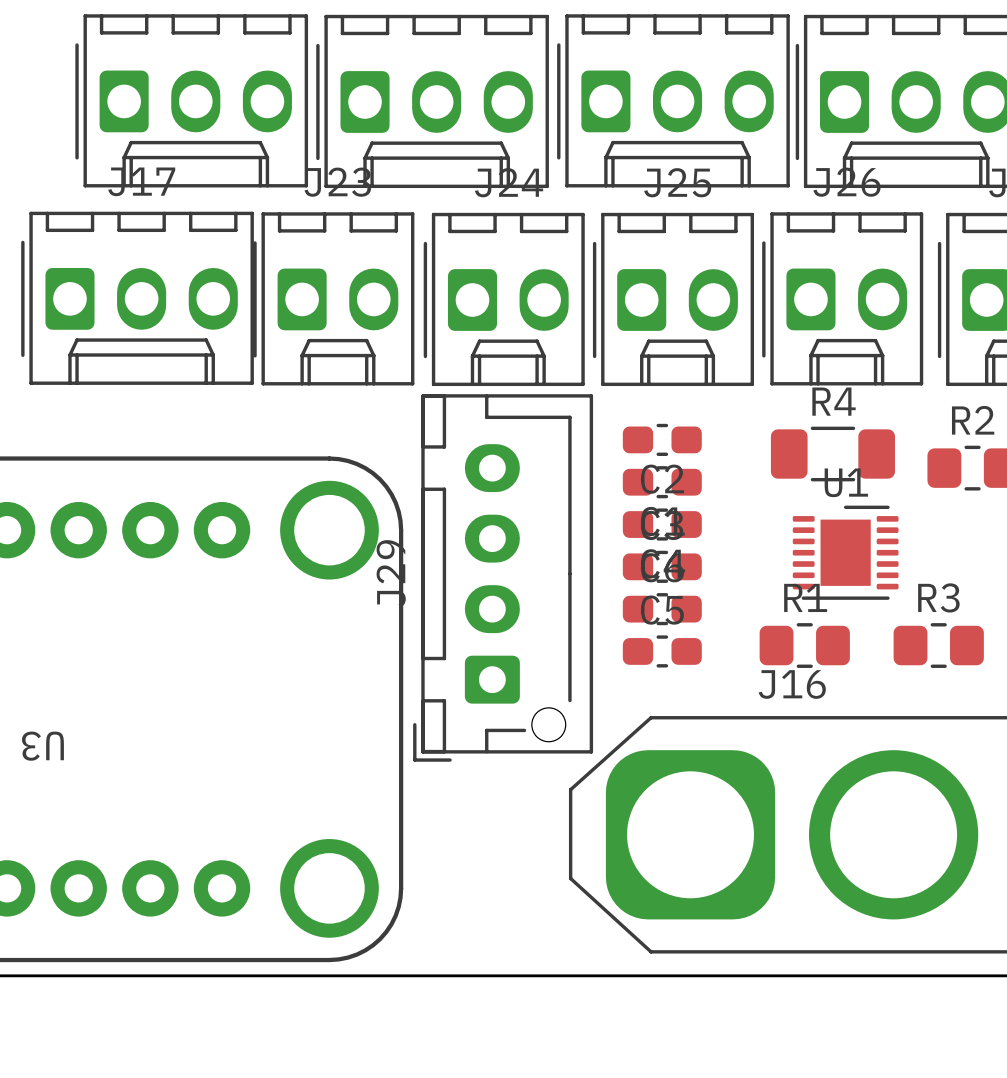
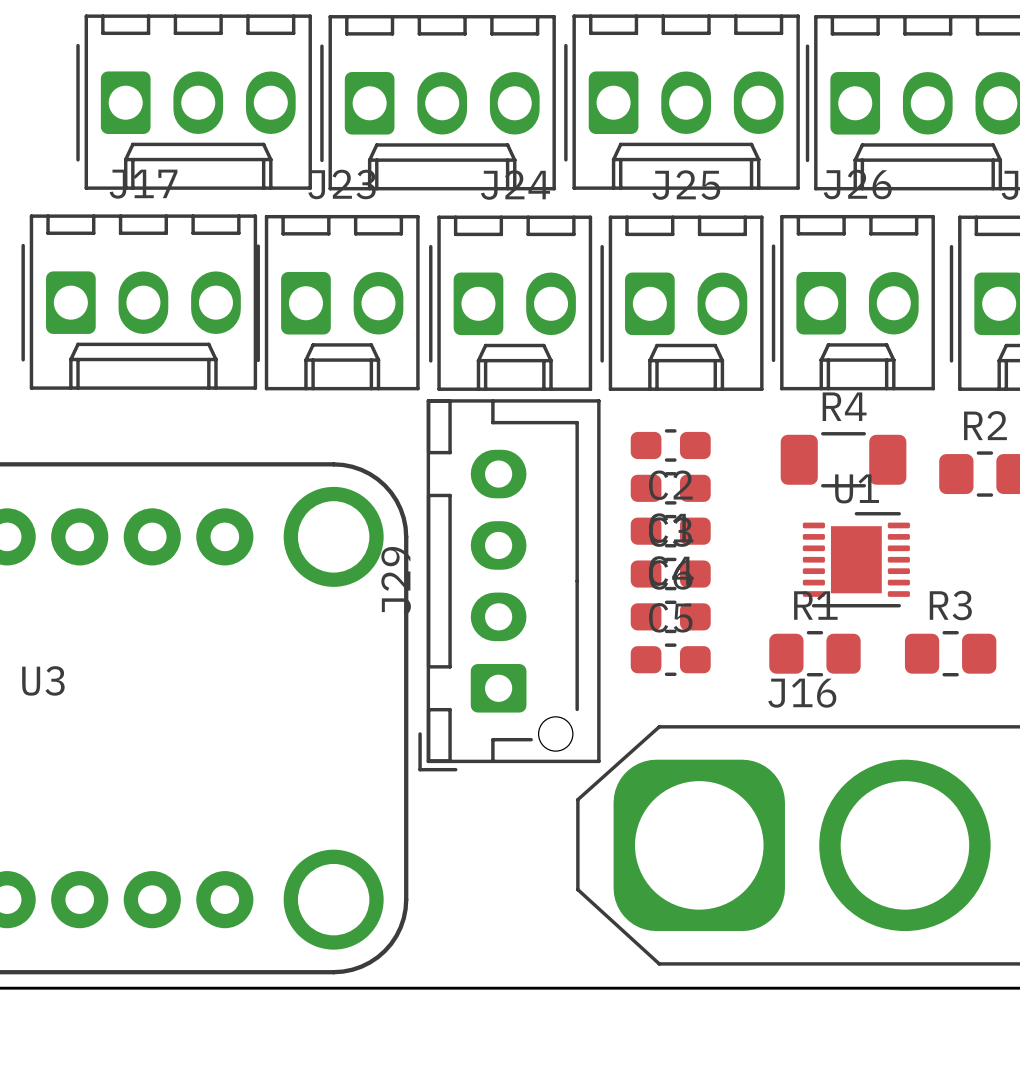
U3 name rotation: 0° (42, 746) -> 180° (43, 680)
U3 name position: U3 (42, 746) -> U3 (43, 680)

